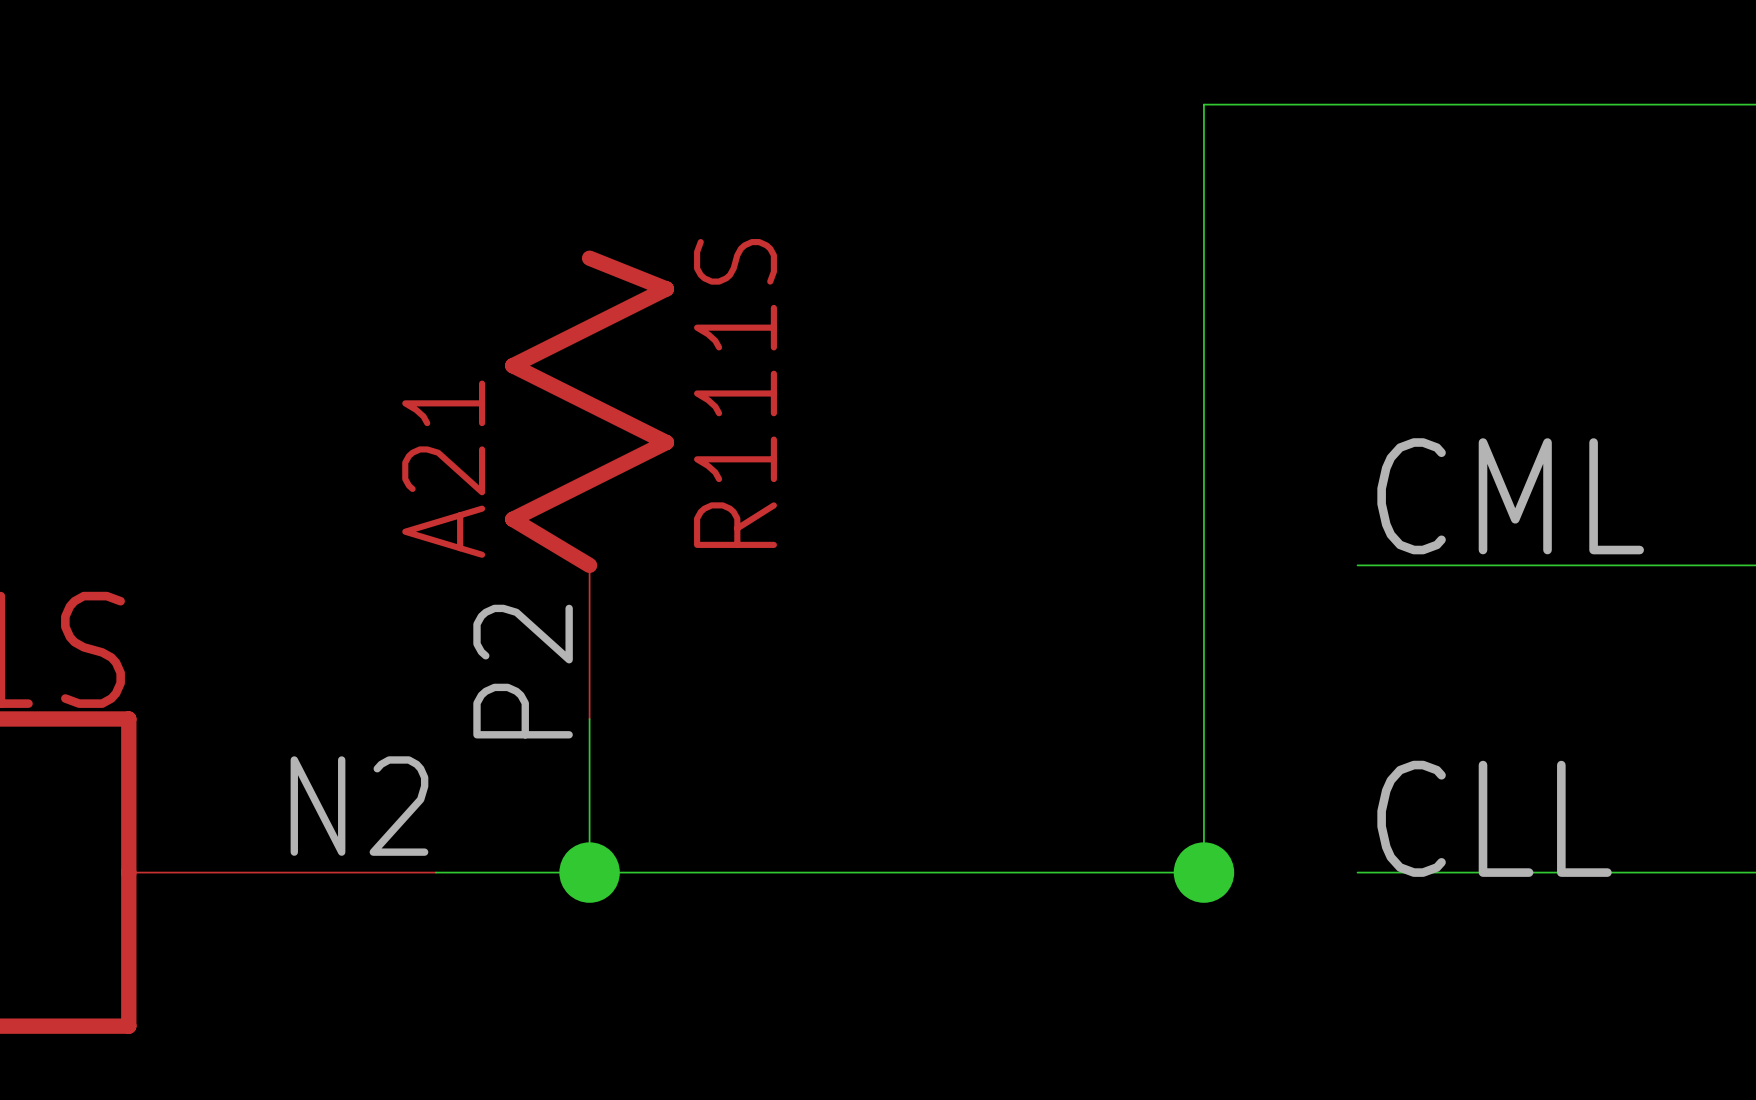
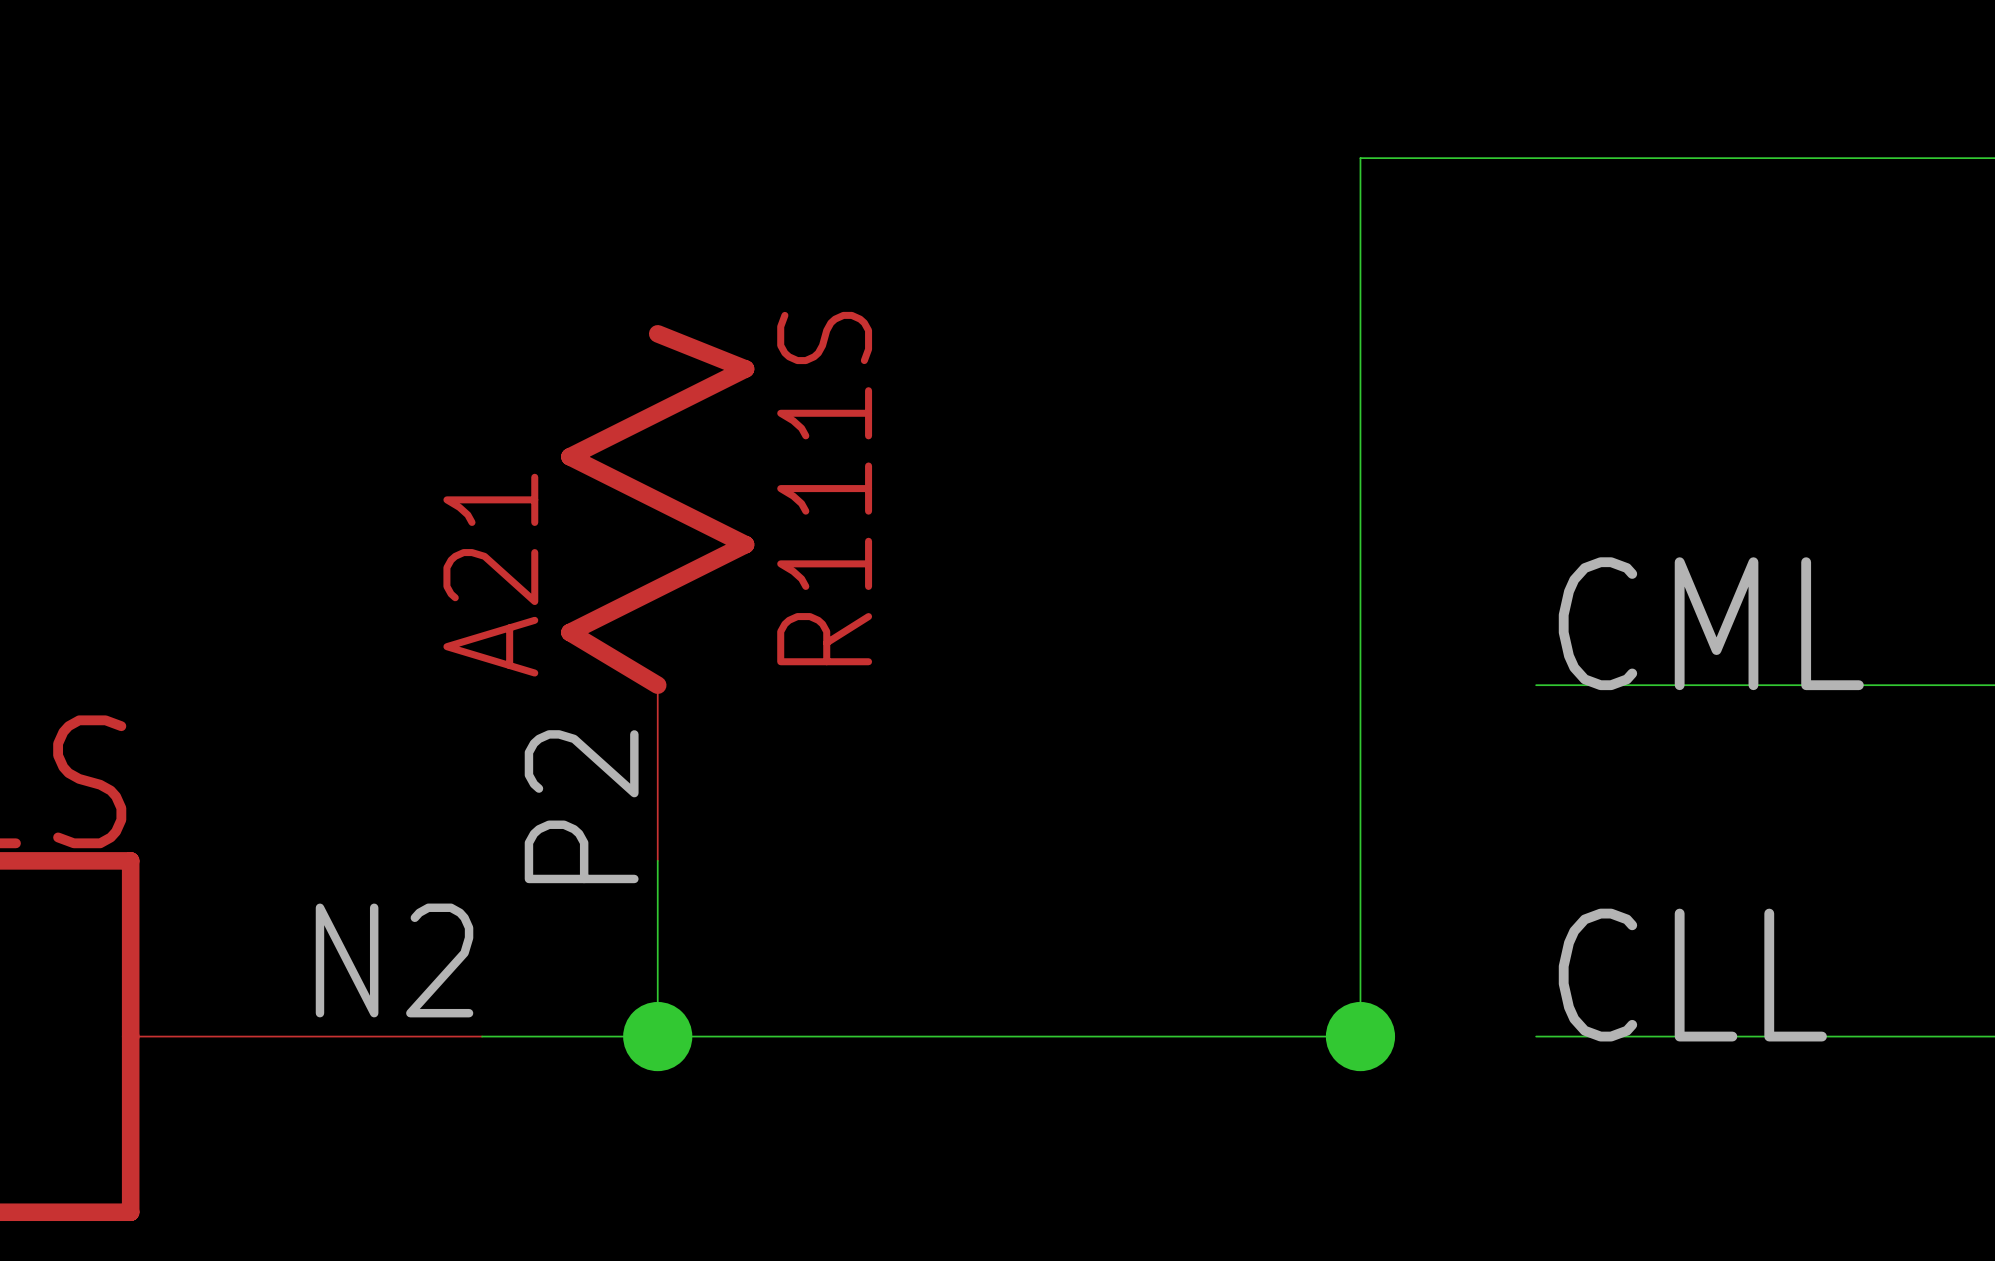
label position: CML (1510, 496) -> CML (1711, 623)

